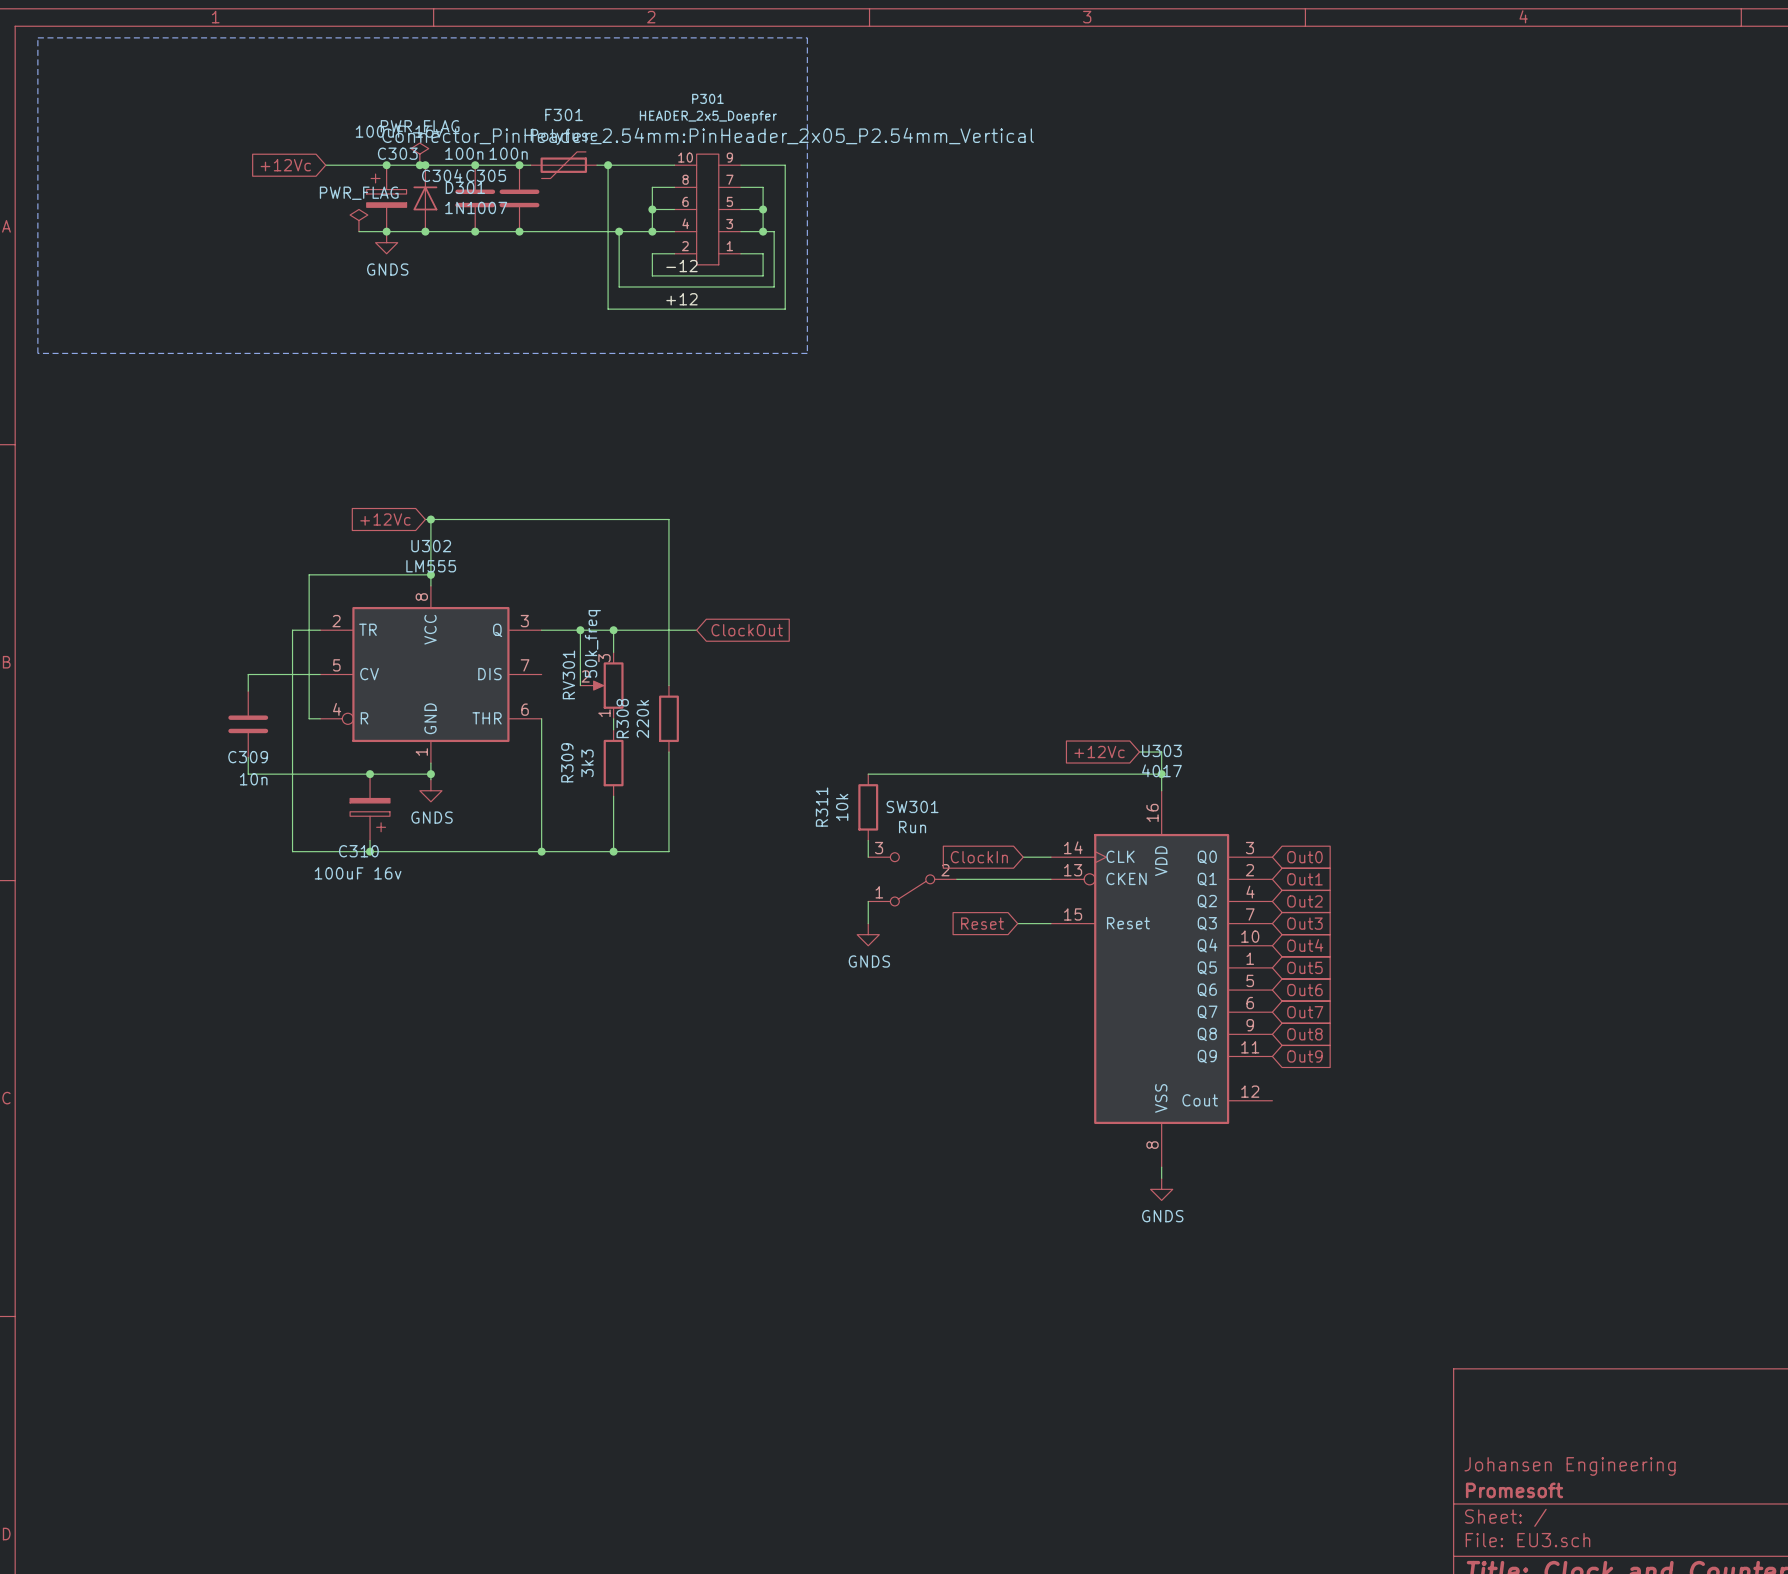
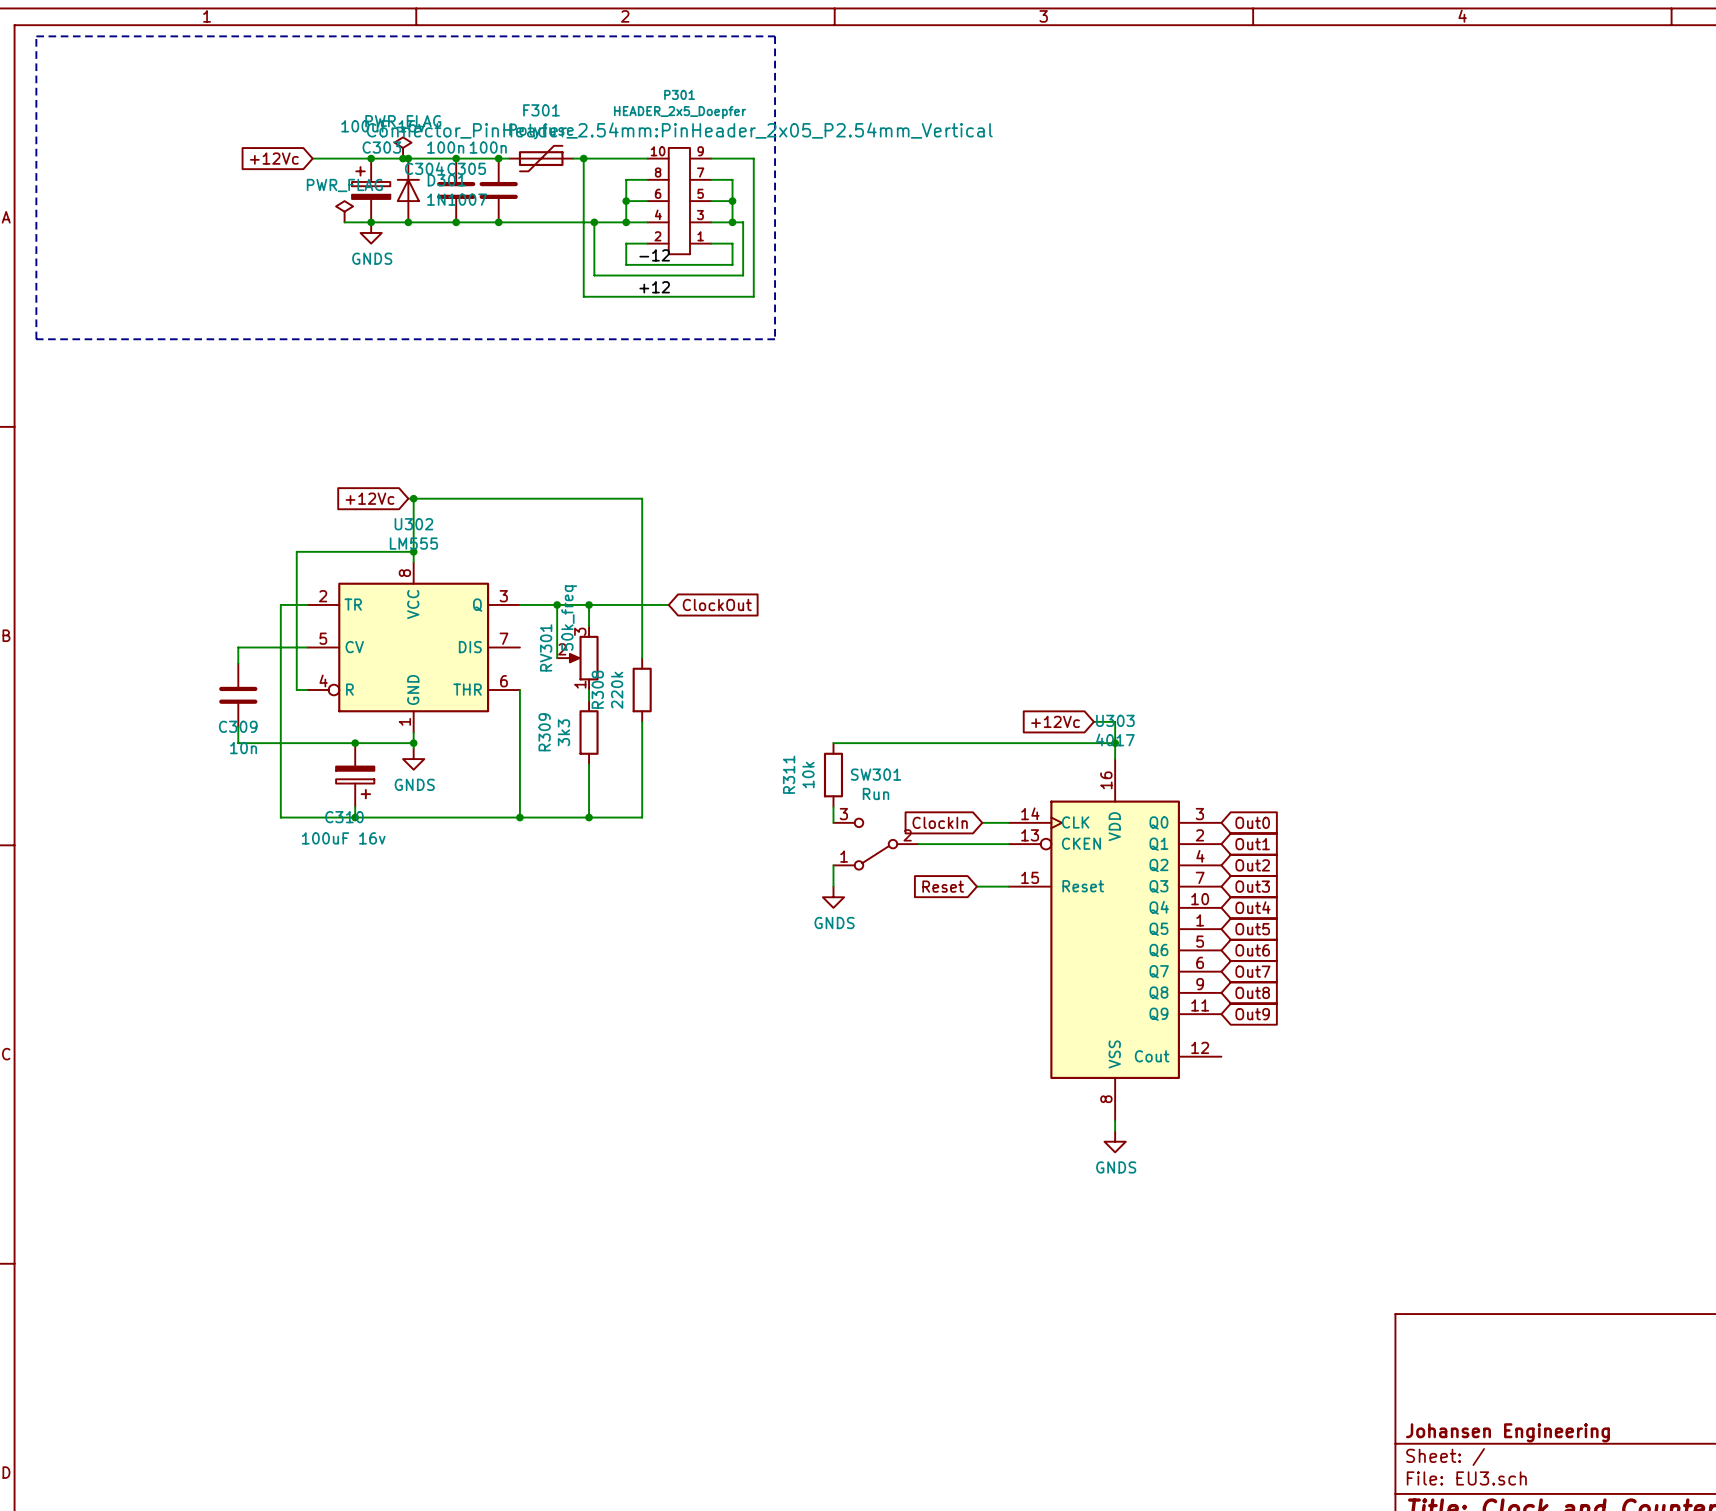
title block: Johansen Engineering (1570, 1466) -> none
title block: Promesoft (1514, 1490) -> Johansen Engineering (1507, 1432)

